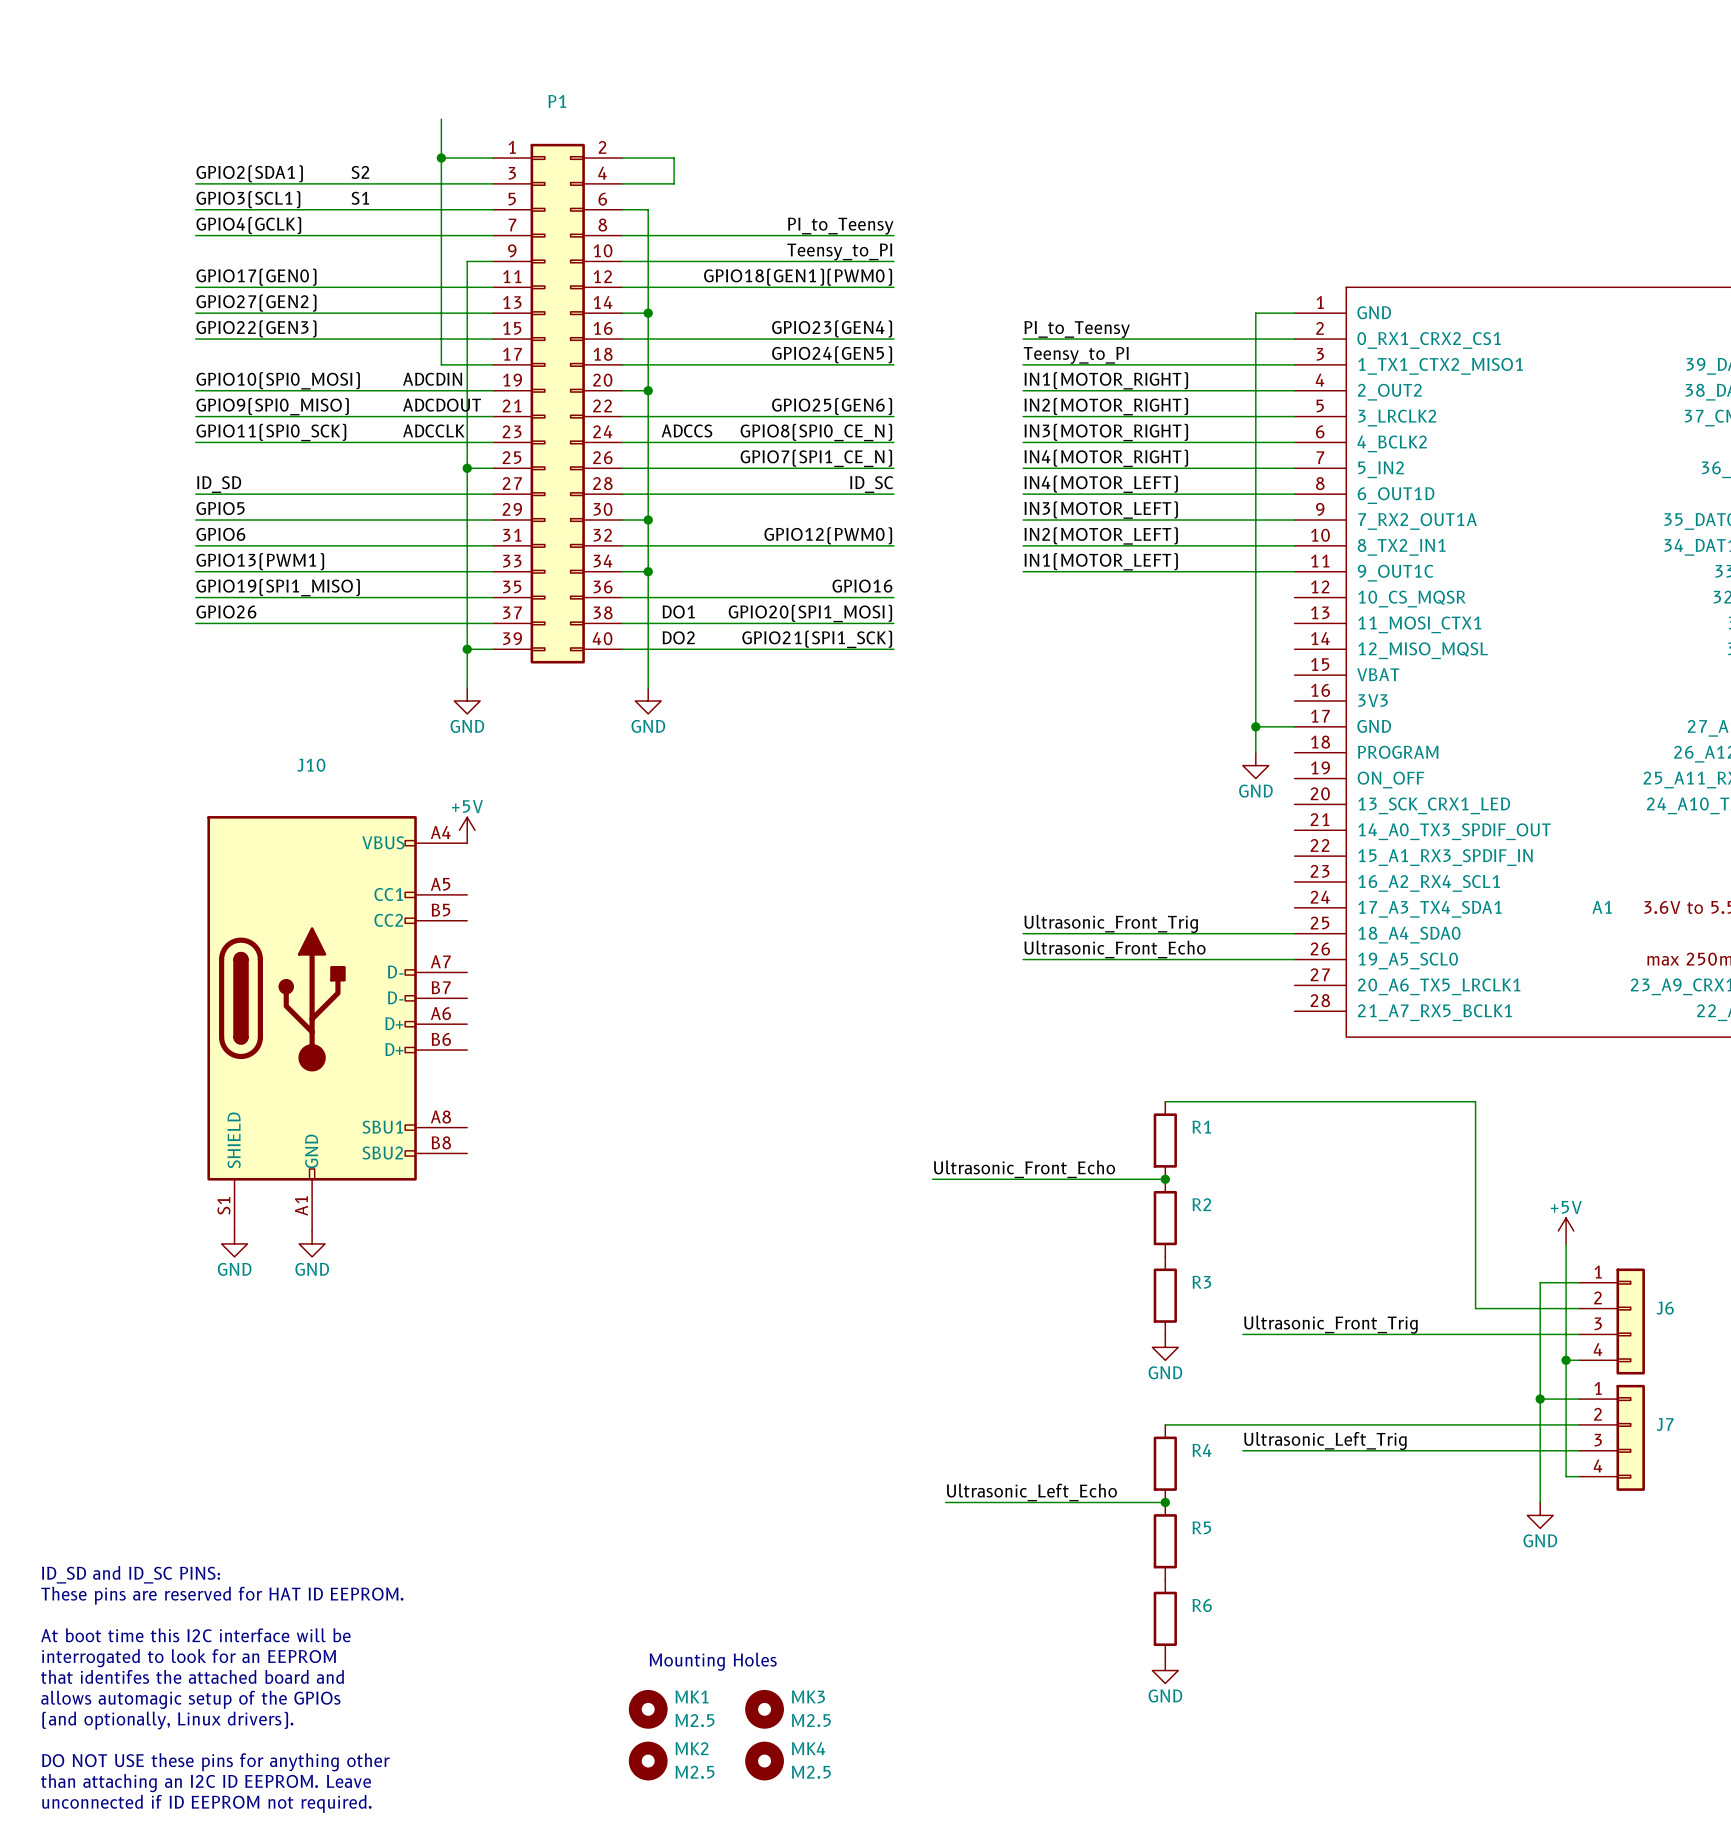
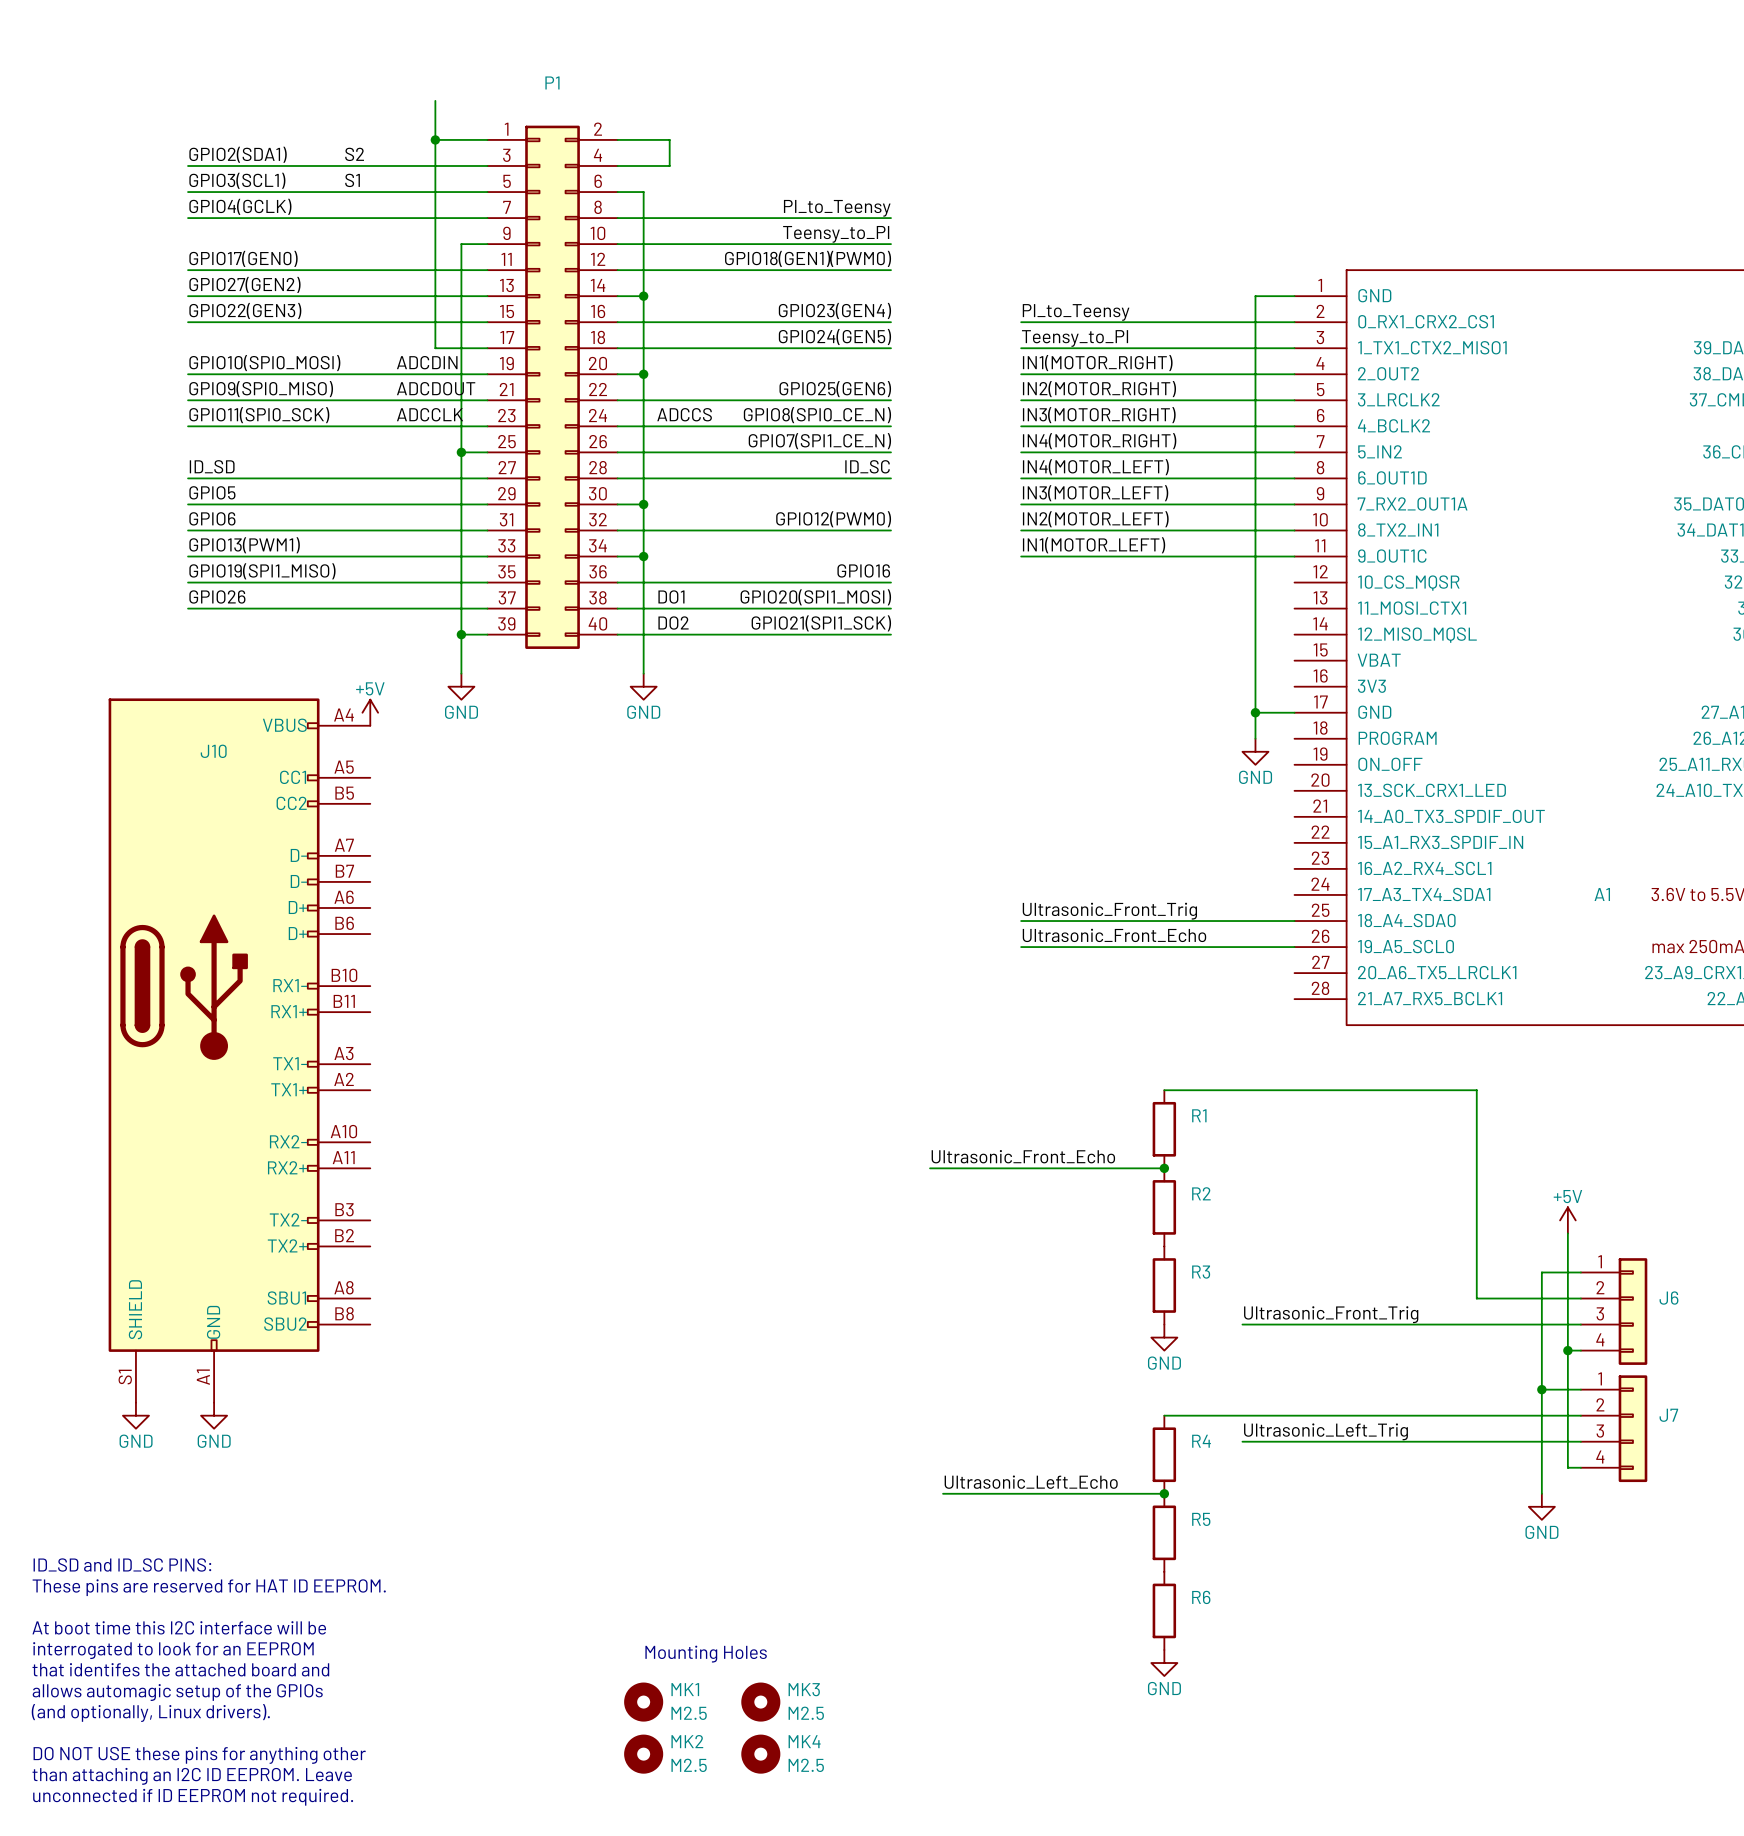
J10 name position: J10 (311, 765) -> J10 (213, 751)
J10 symbol: [207, 816, 468, 1232] -> [108, 698, 371, 1403]
power symbol position: +5V (467, 830) -> +5V (370, 712)
power symbol: GND (234, 1243) -> none
power symbol: GND (312, 1243) -> none
power symbol: none -> GND (135, 1415)
power symbol: none -> GND (214, 1415)

